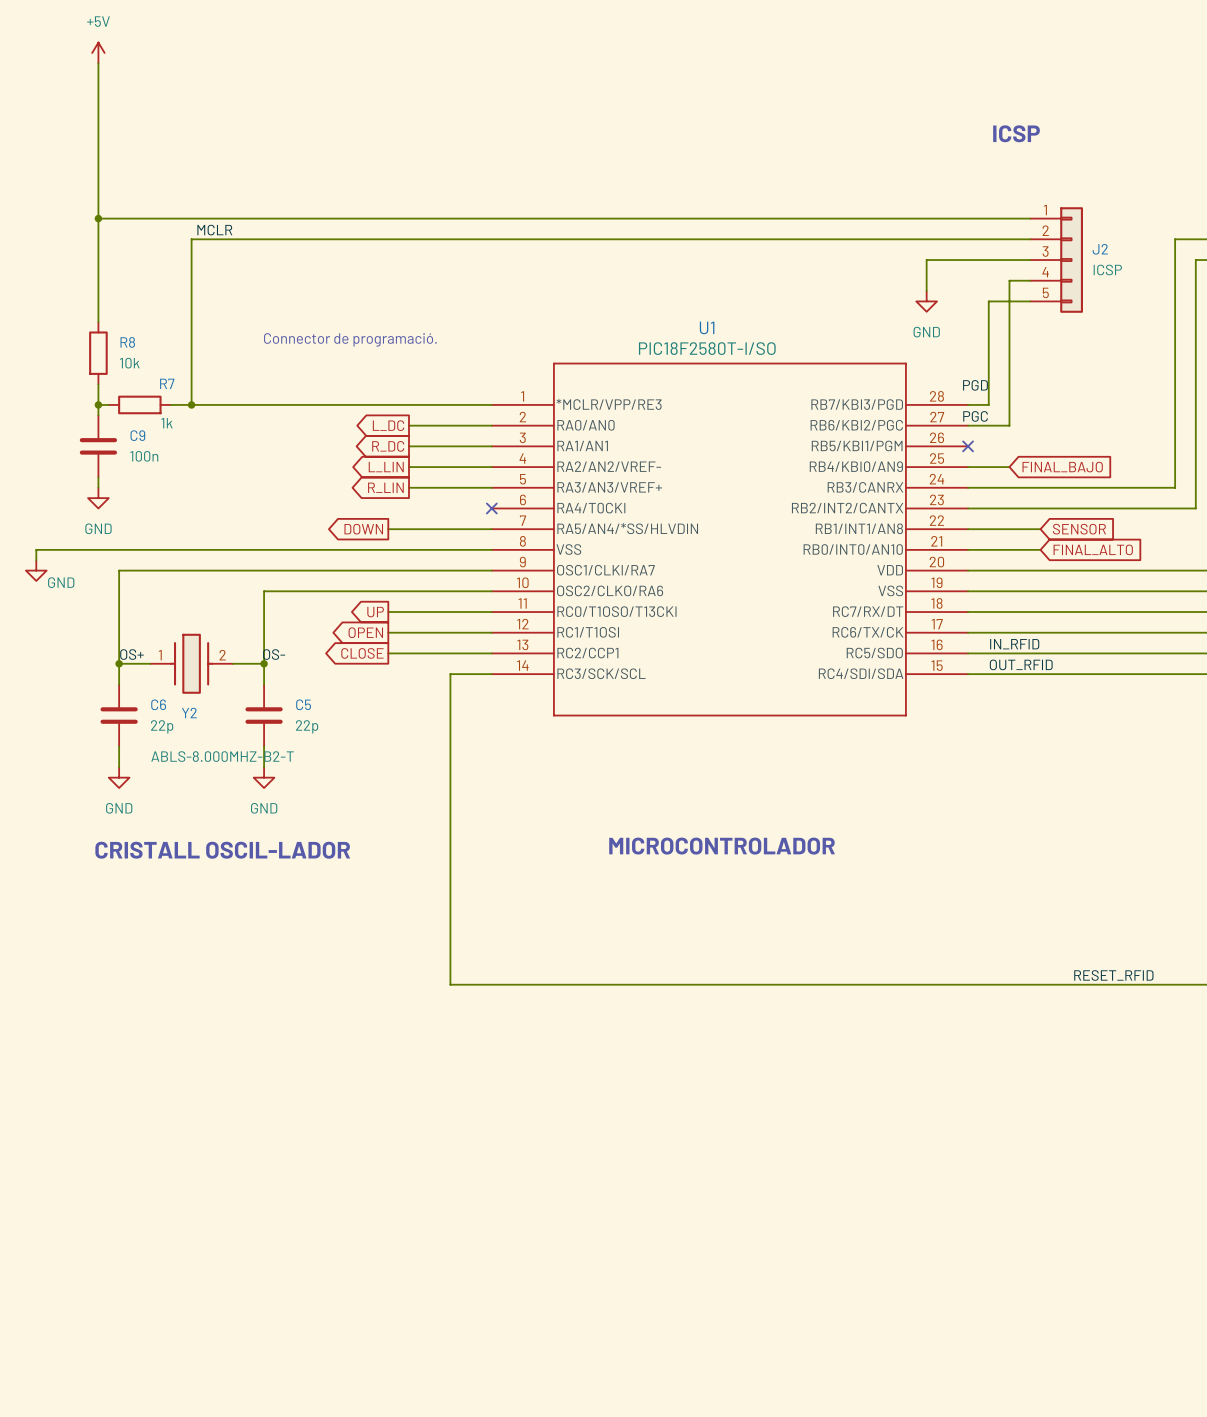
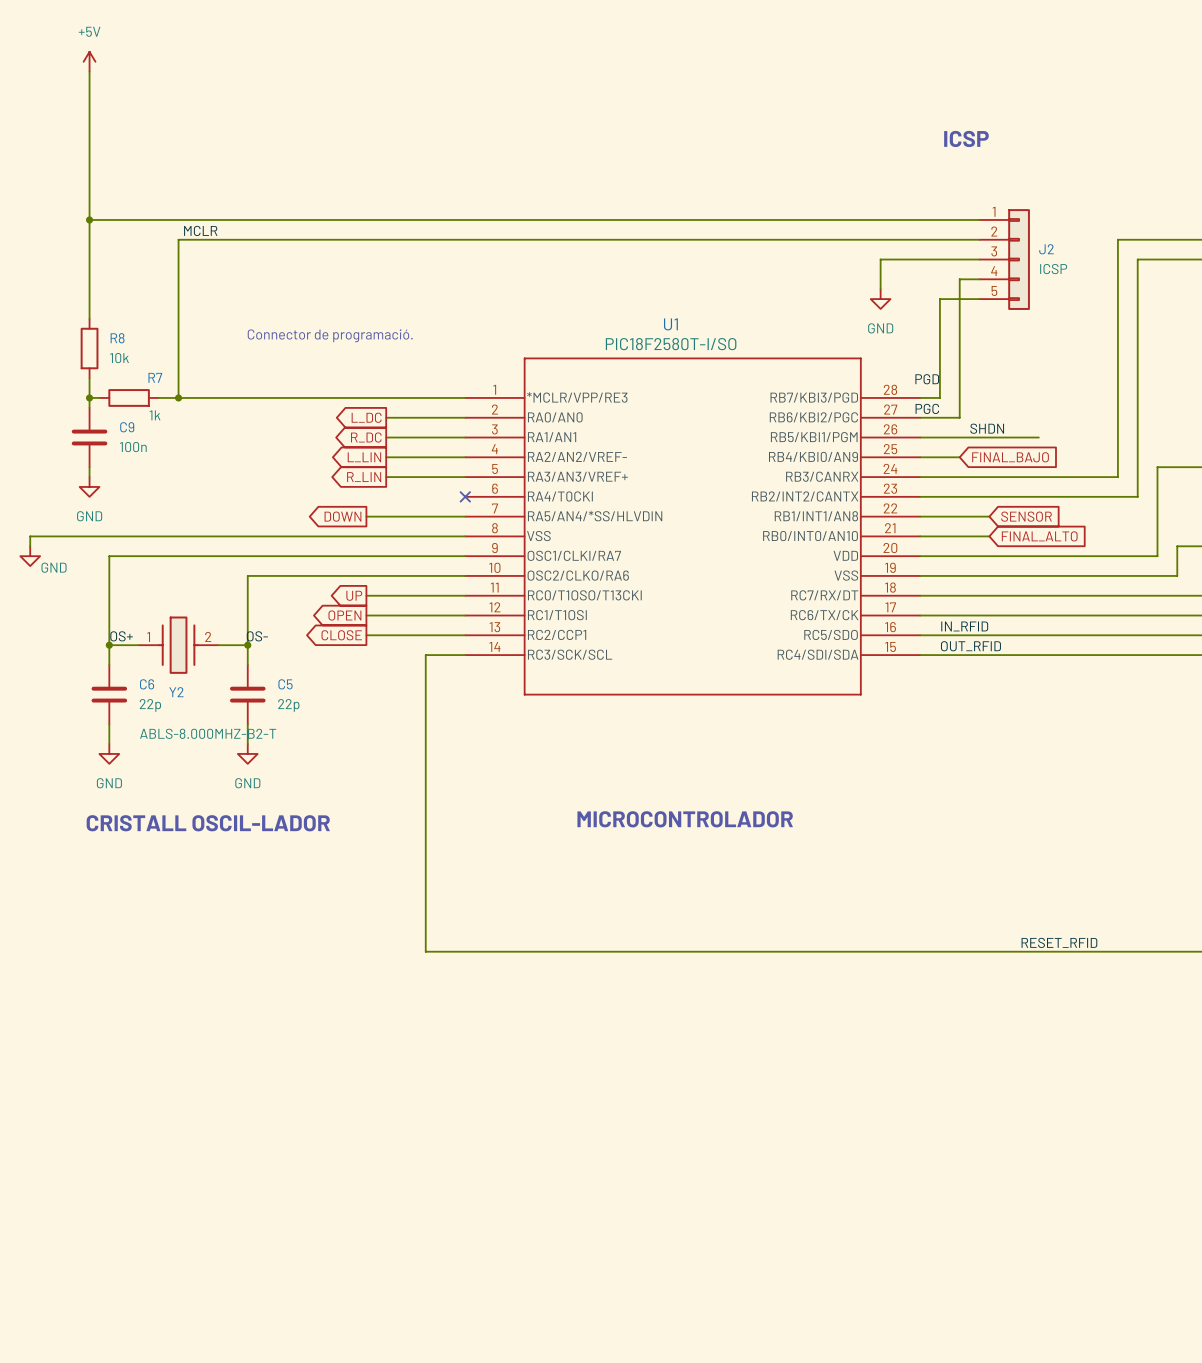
label: none -> SHDN (987, 428)
wire: none -> (920, 437) (1038, 437)
no-connect mark: (968, 446) -> none

